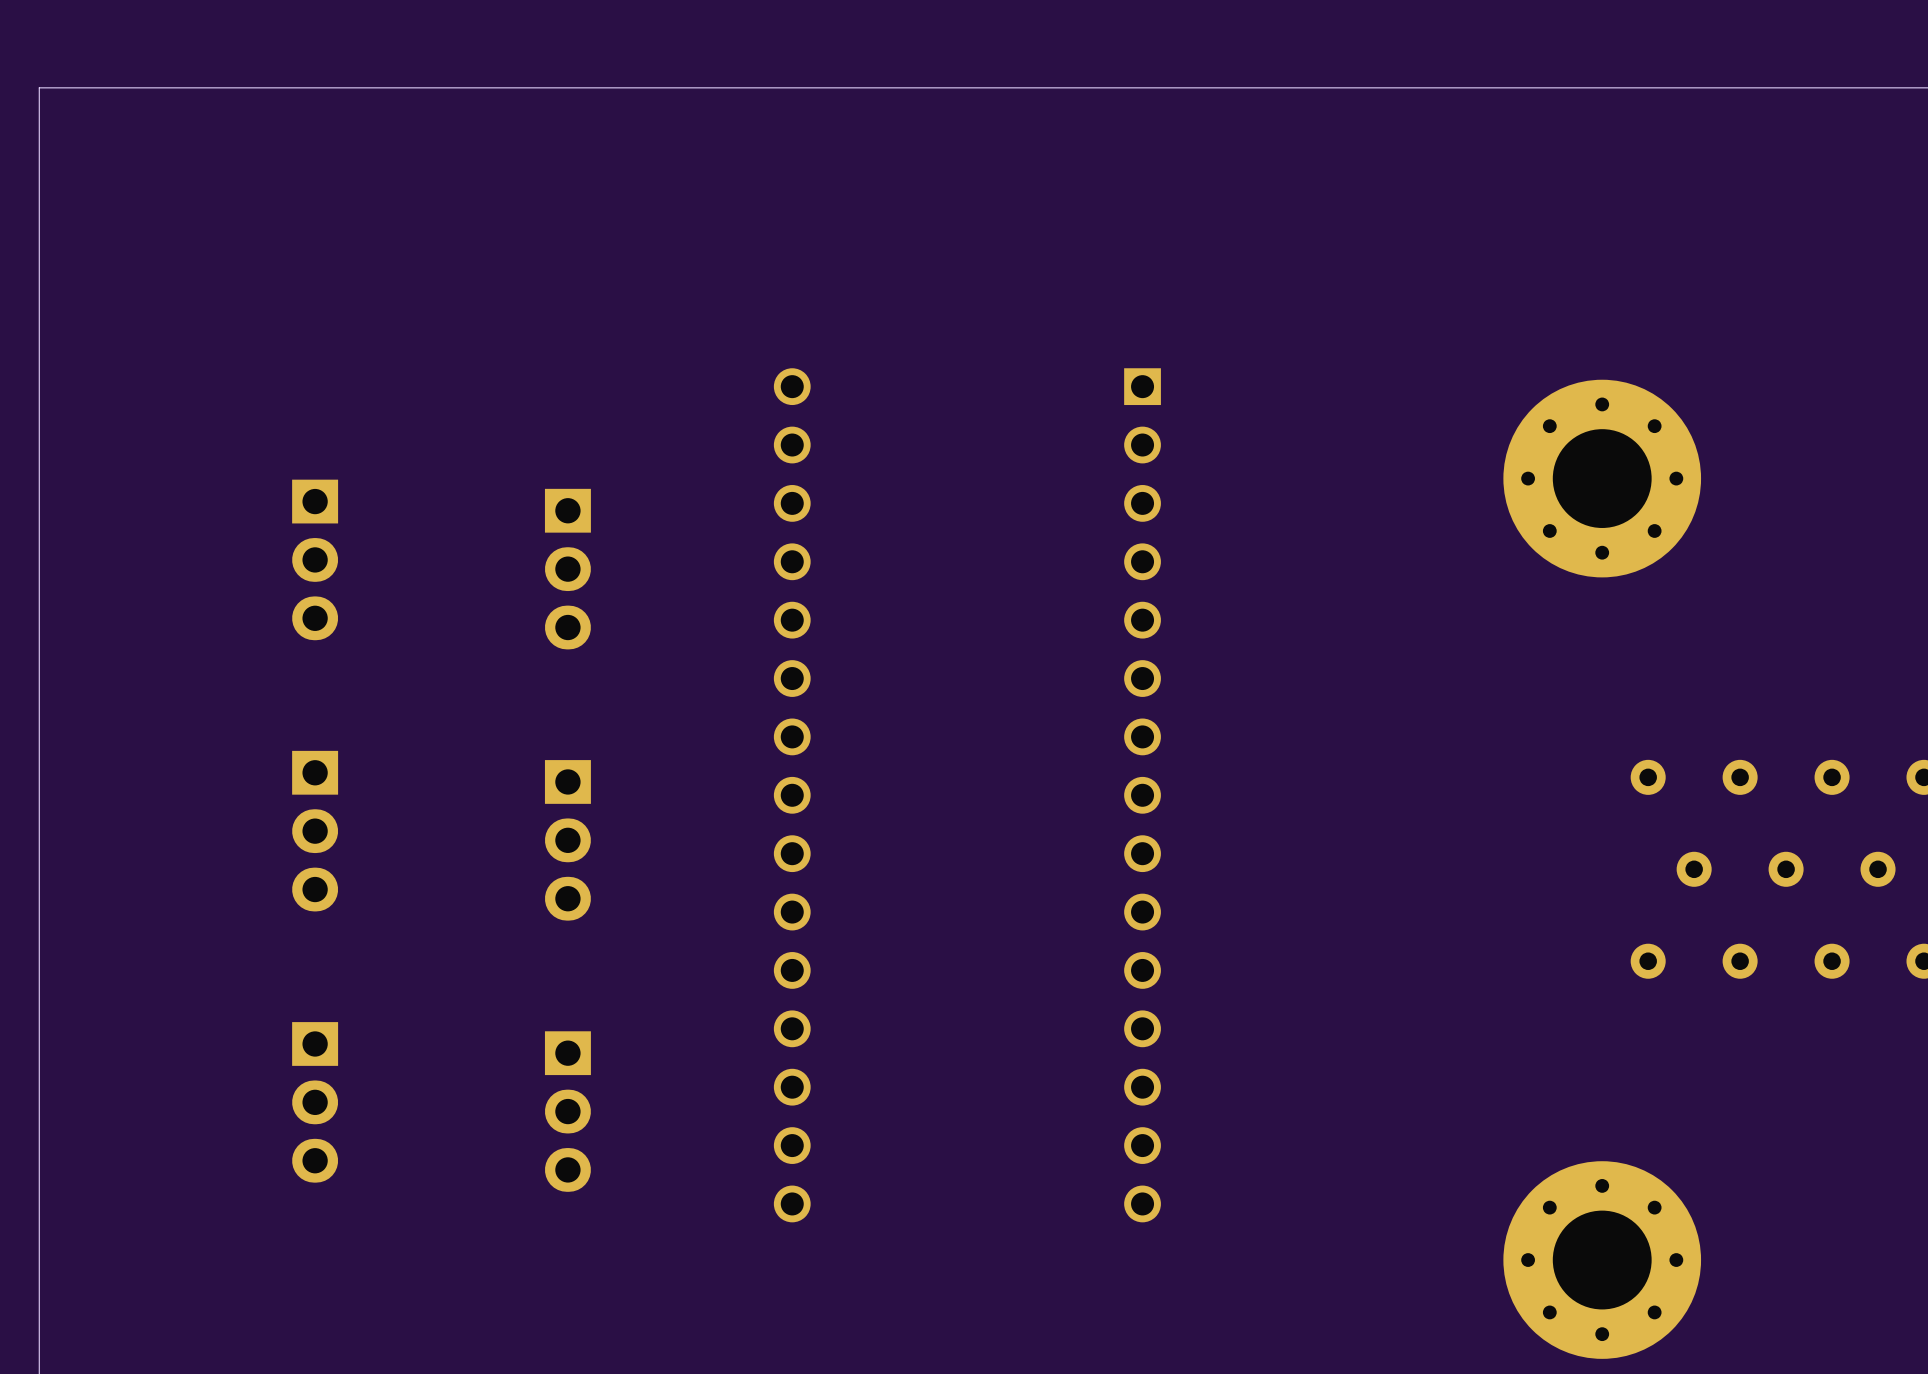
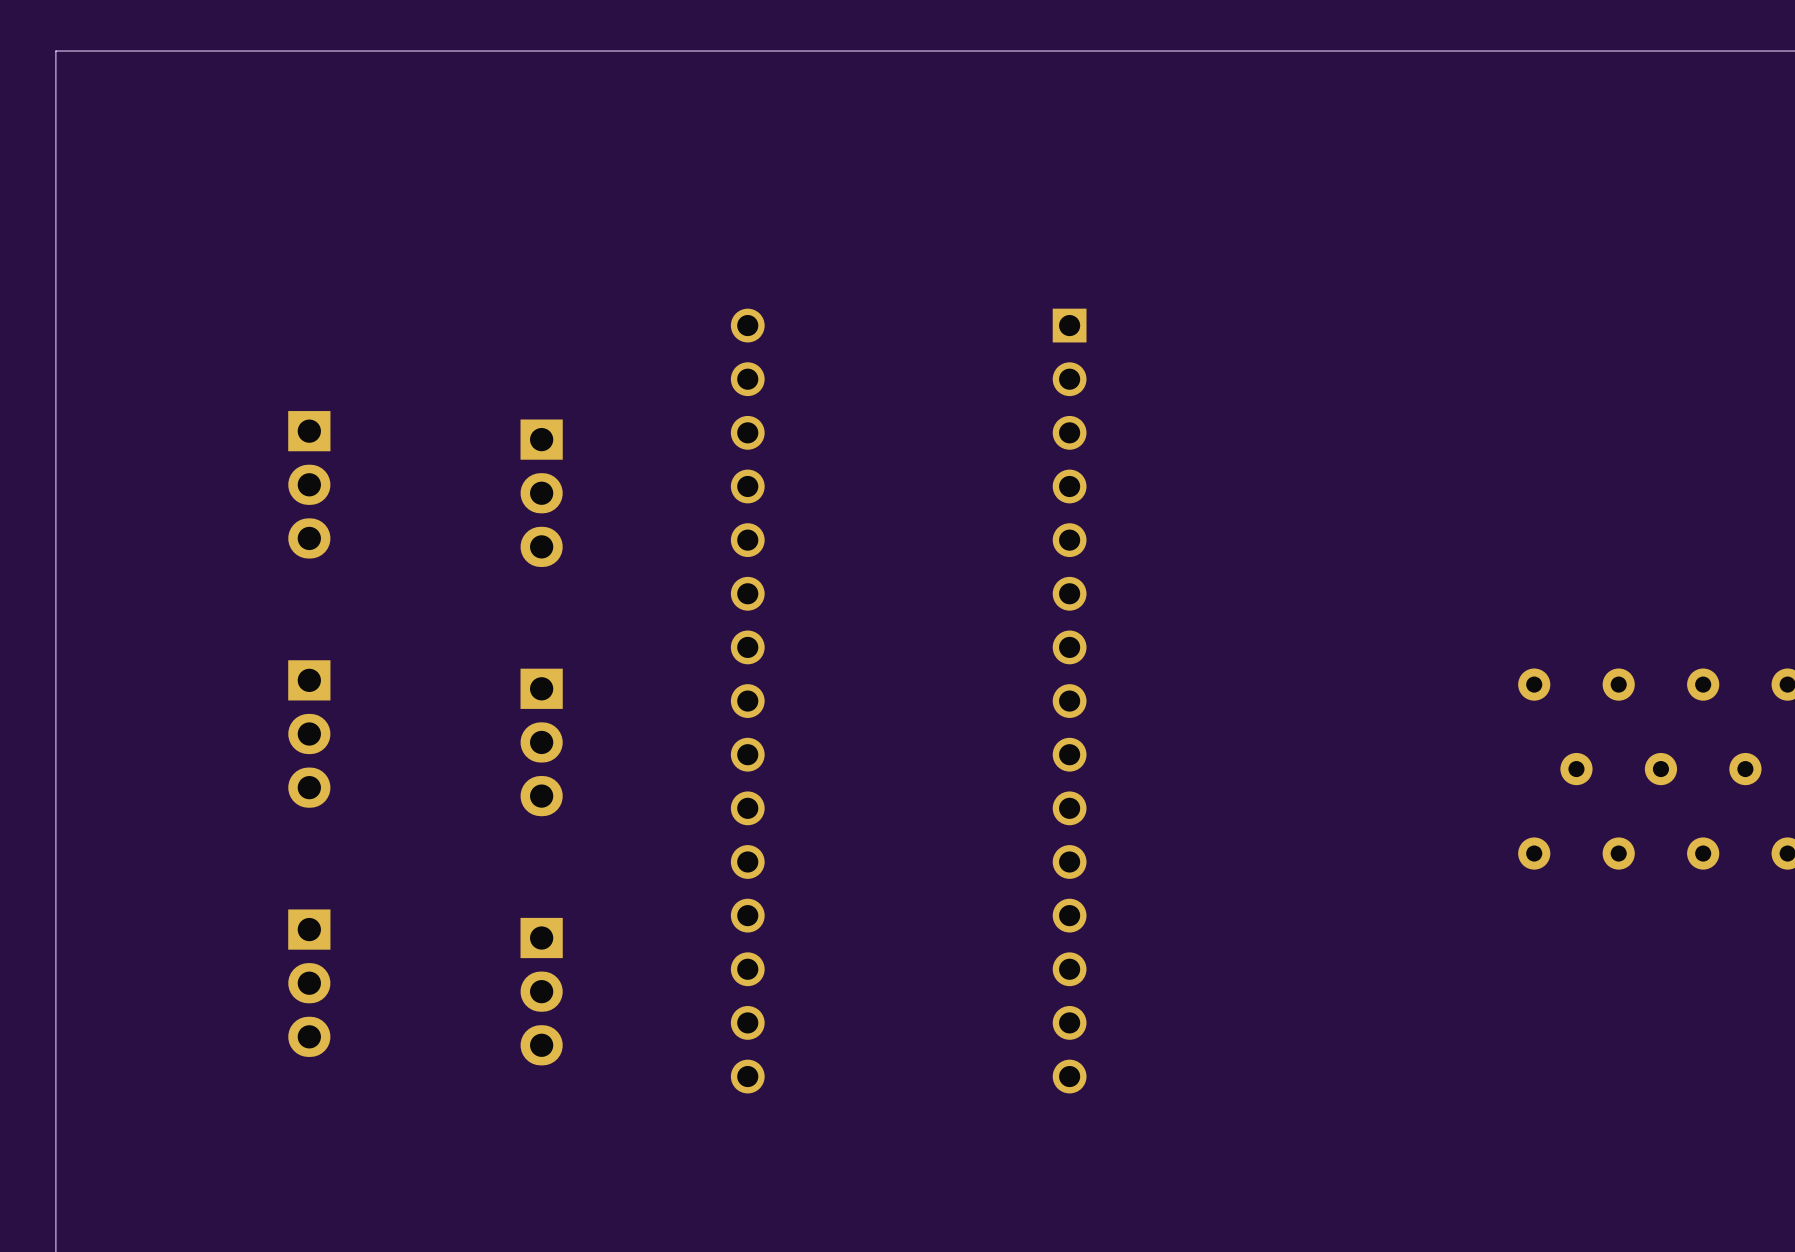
part: (1602, 478) -> none
part: (1602, 1260) -> none

